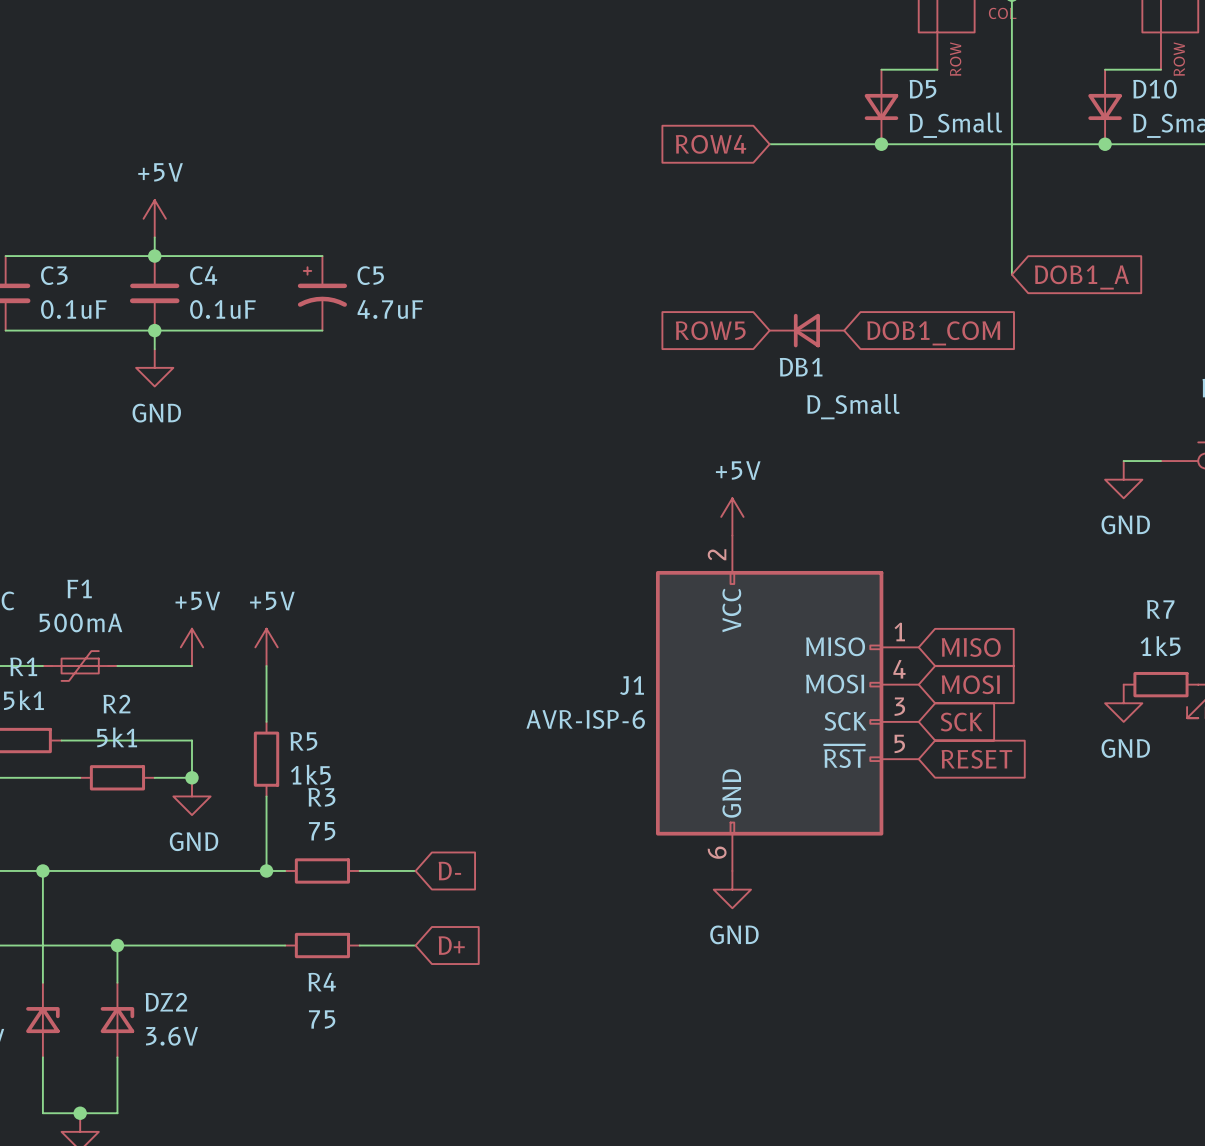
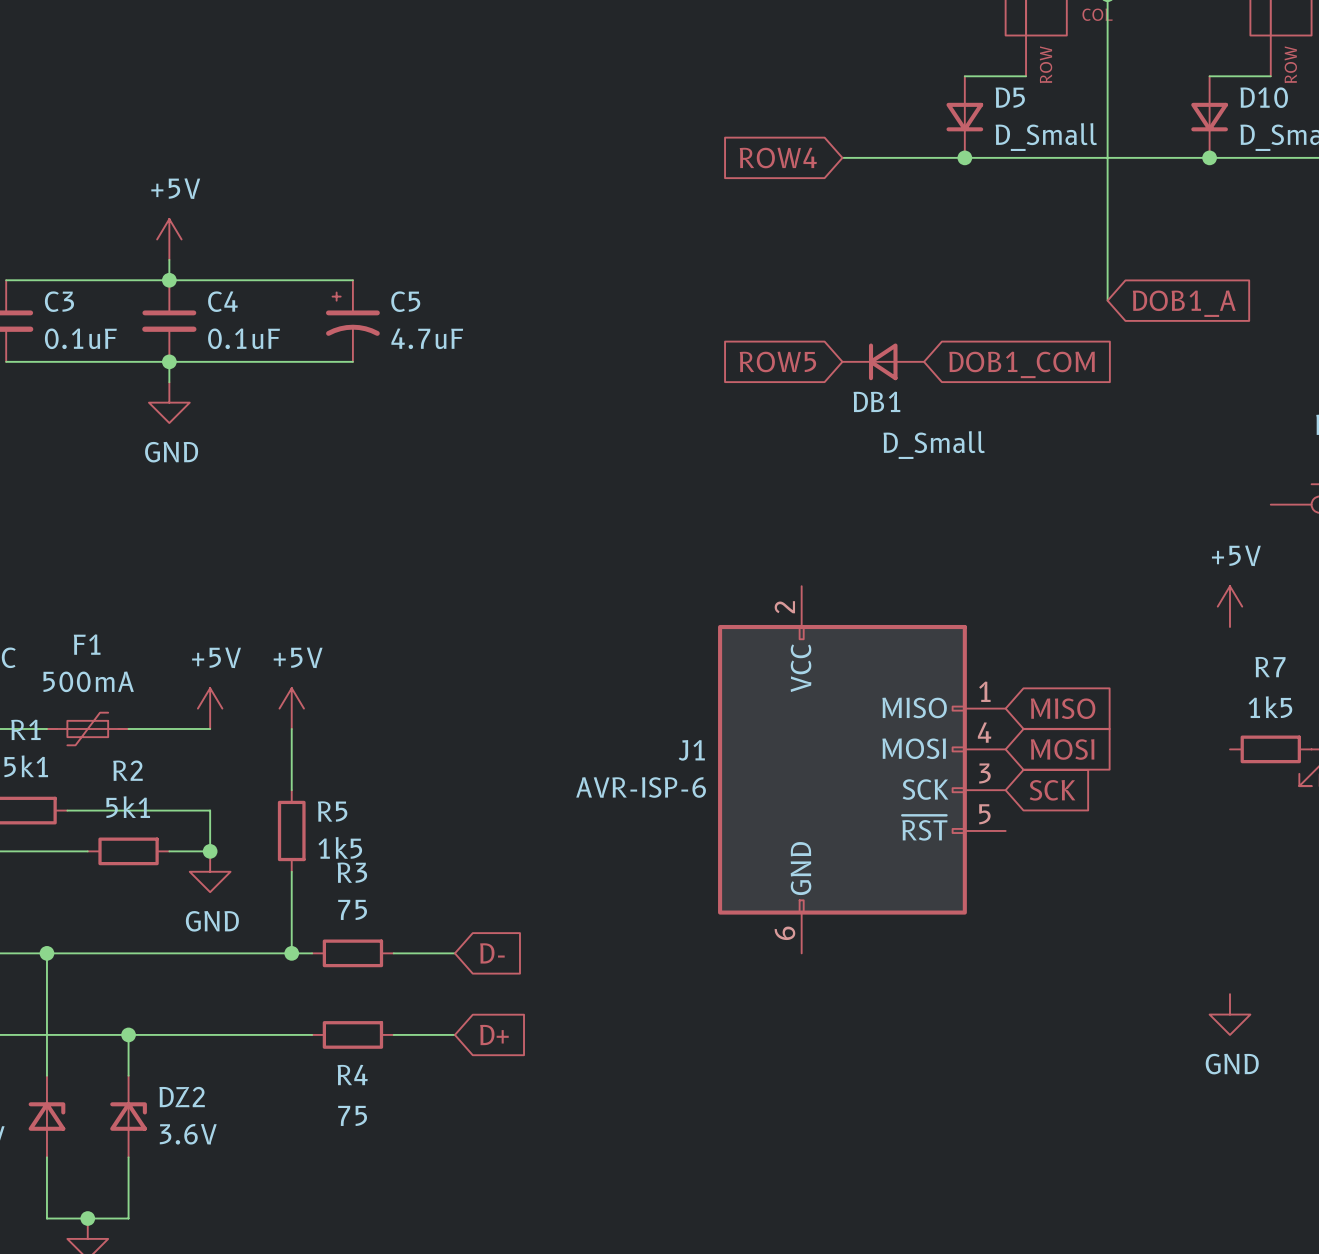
wire: (1123, 461) (1160, 461) -> none
power symbol: GND (1123, 479) -> none
power symbol: +5V (732, 516) -> none
power symbol: none -> +5V (1229, 606)
power symbol: GND (1123, 703) -> none
global label: RESET (976, 759) -> none
power symbol: GND (732, 889) -> none
power symbol: none -> GND (1229, 1014)

